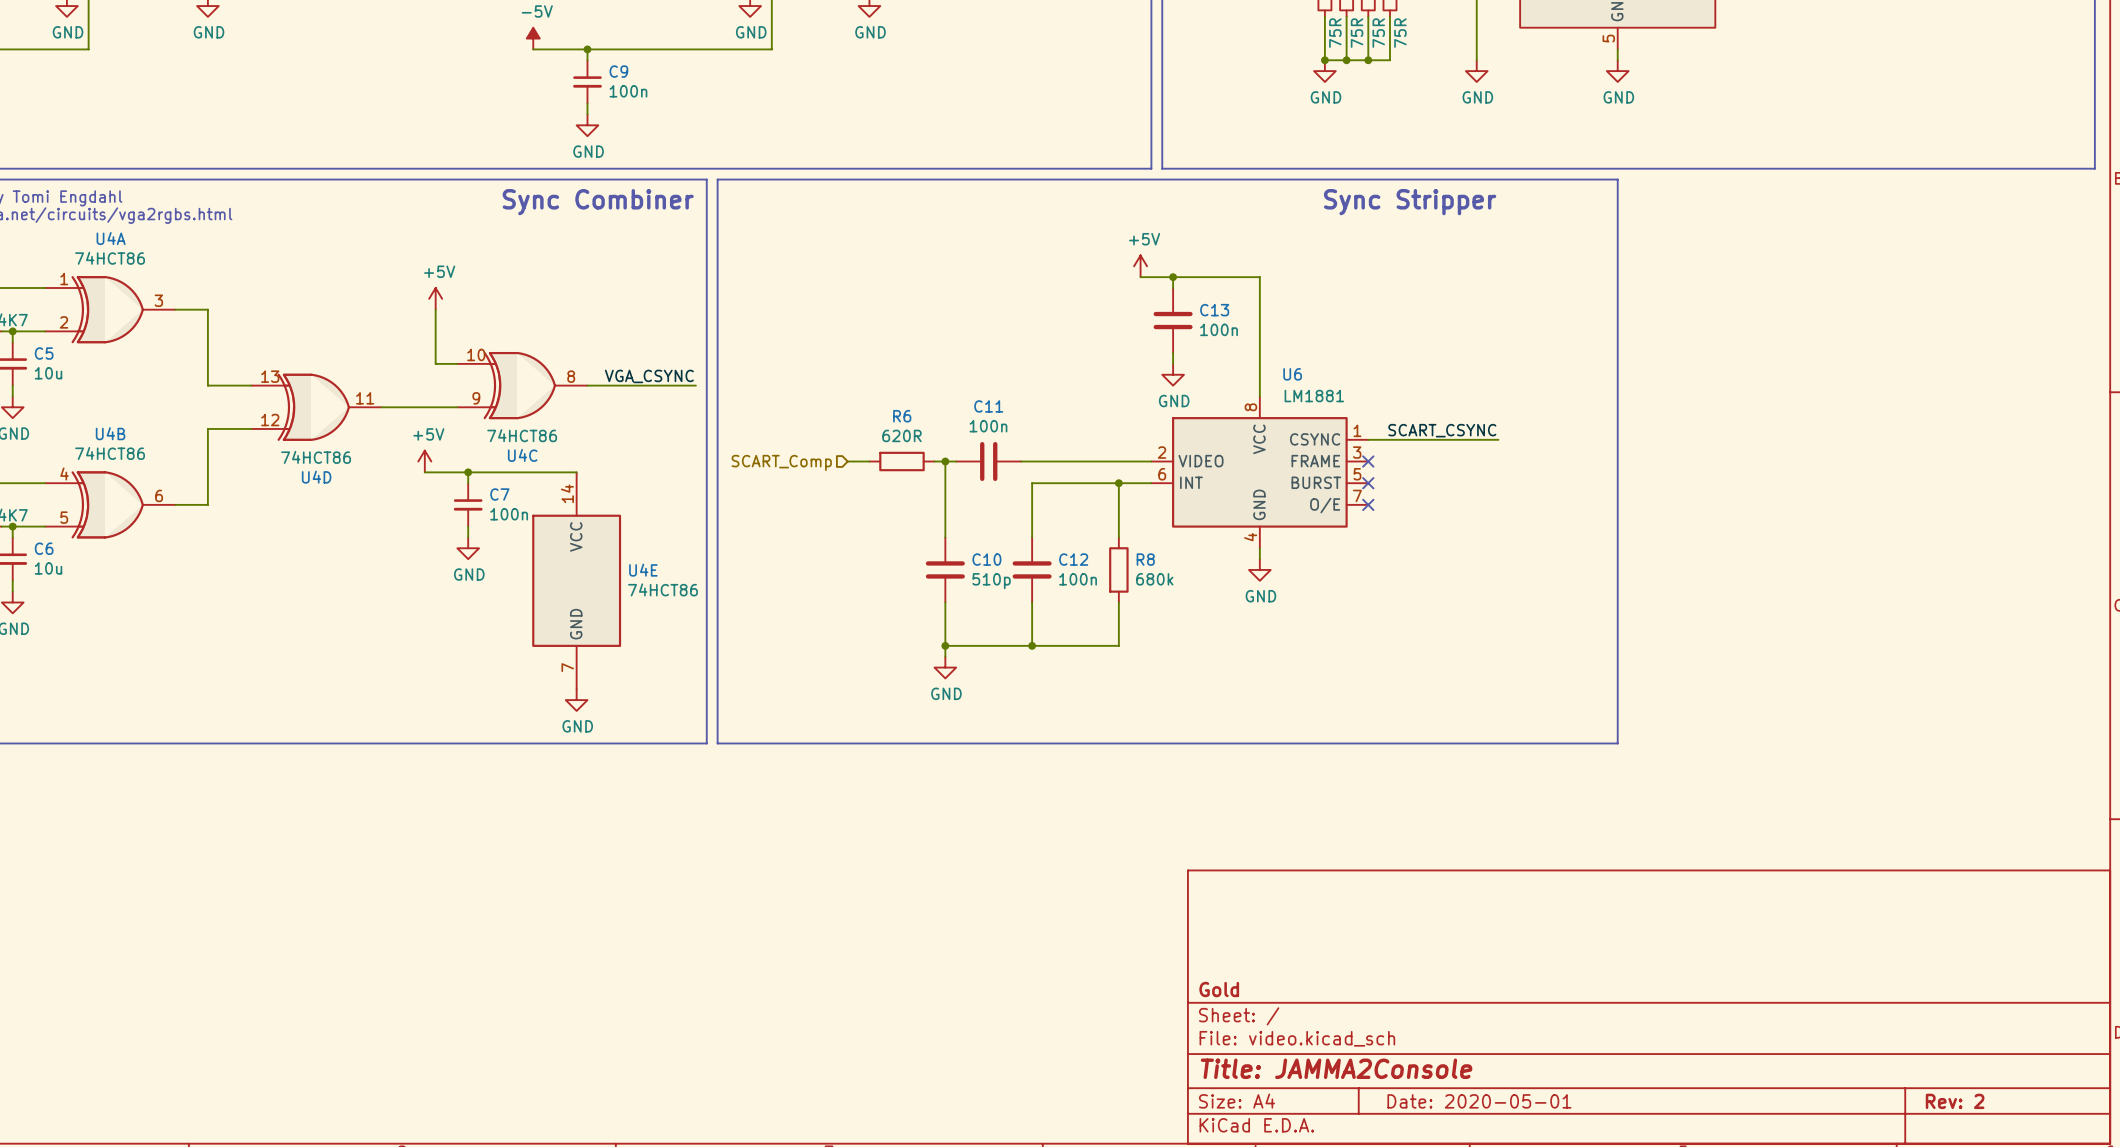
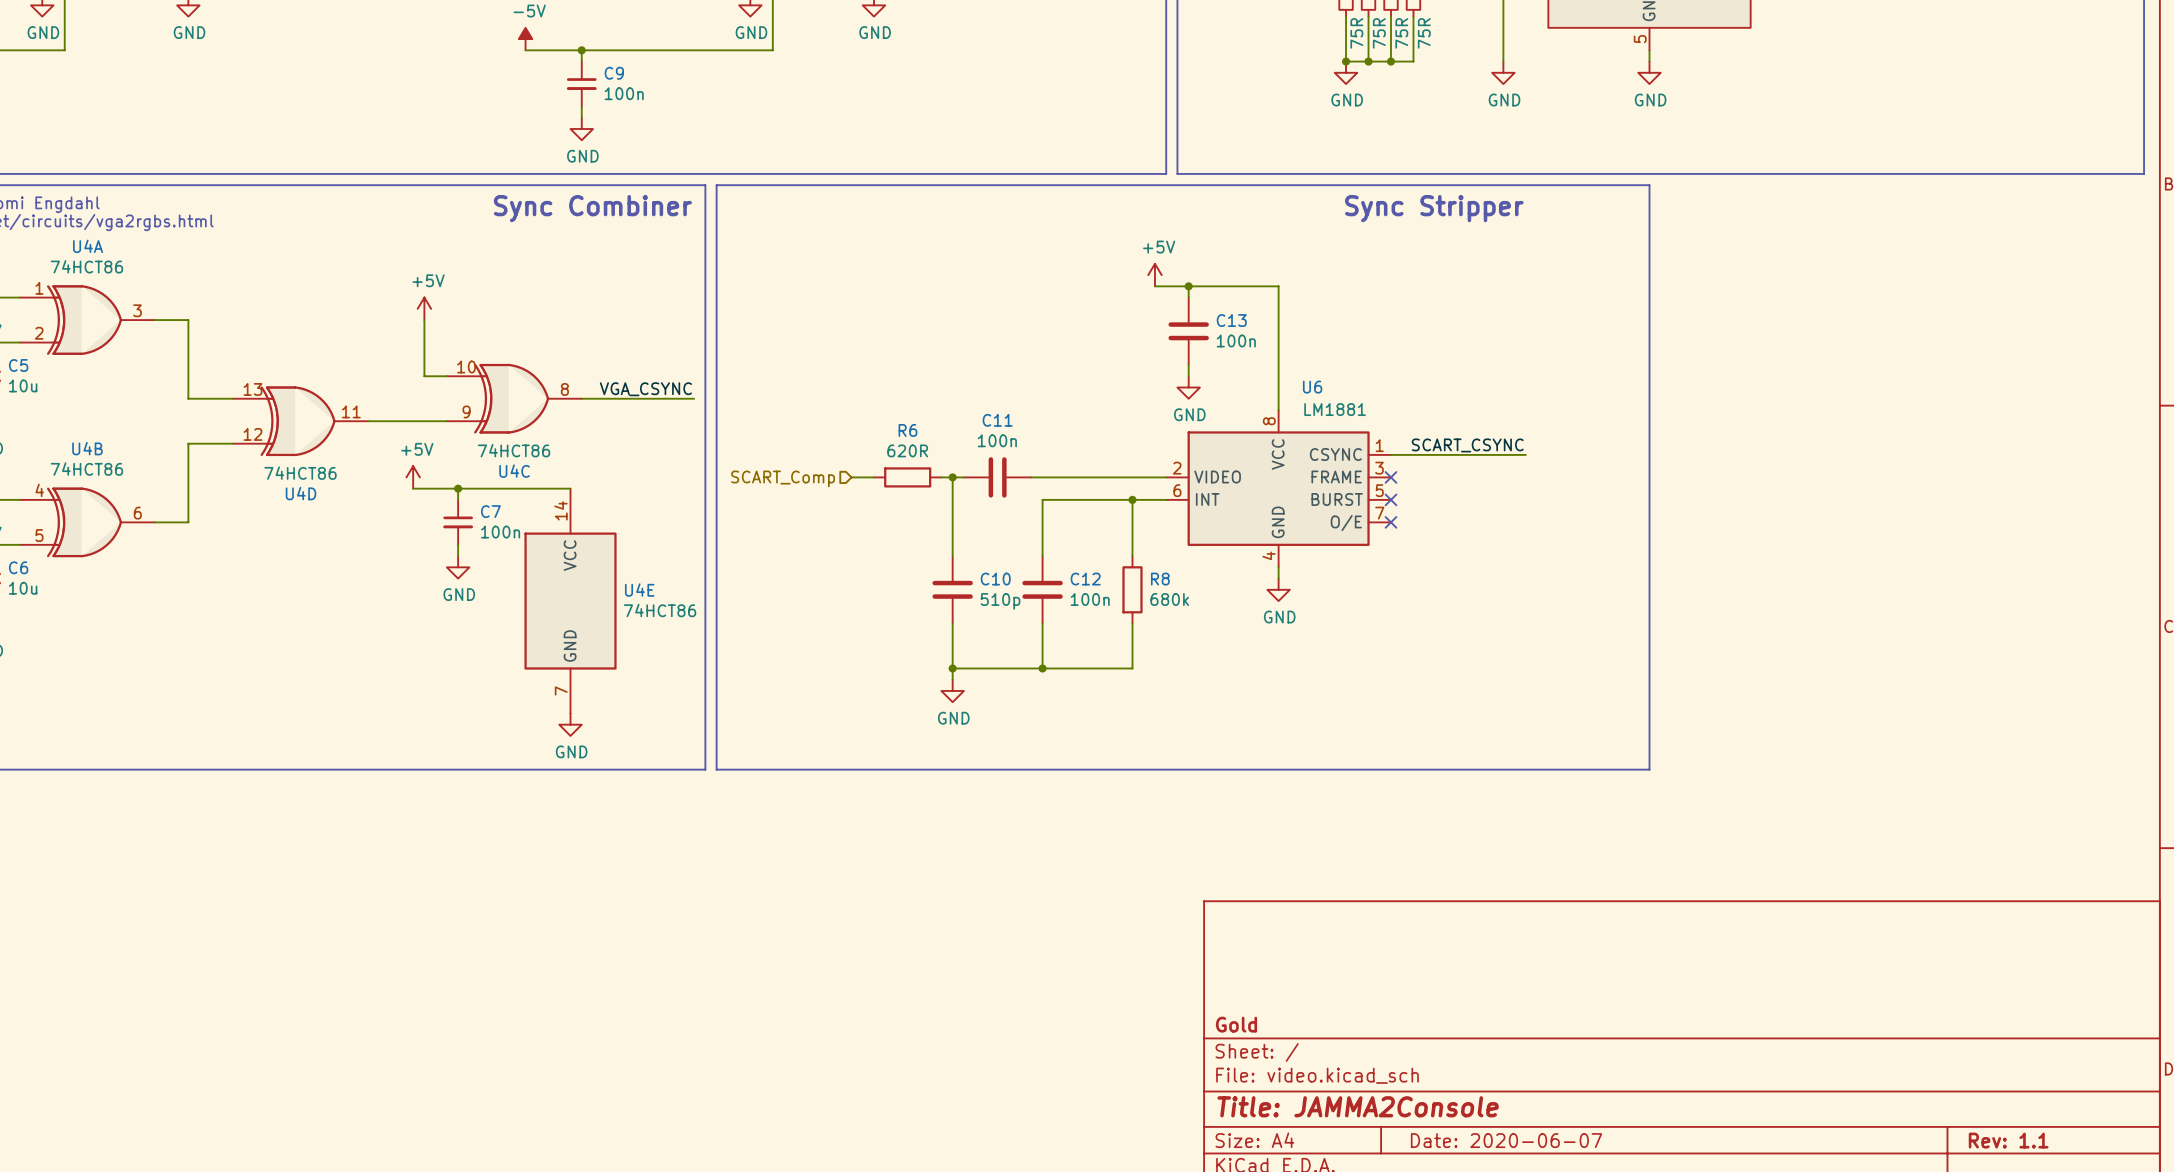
title block: Date: 2020-05-01 (1479, 1101) -> Date: 2020-06-07 (1506, 1140)
title block: Rev: 2 (1955, 1101) -> Rev: 1.1 (2008, 1140)

